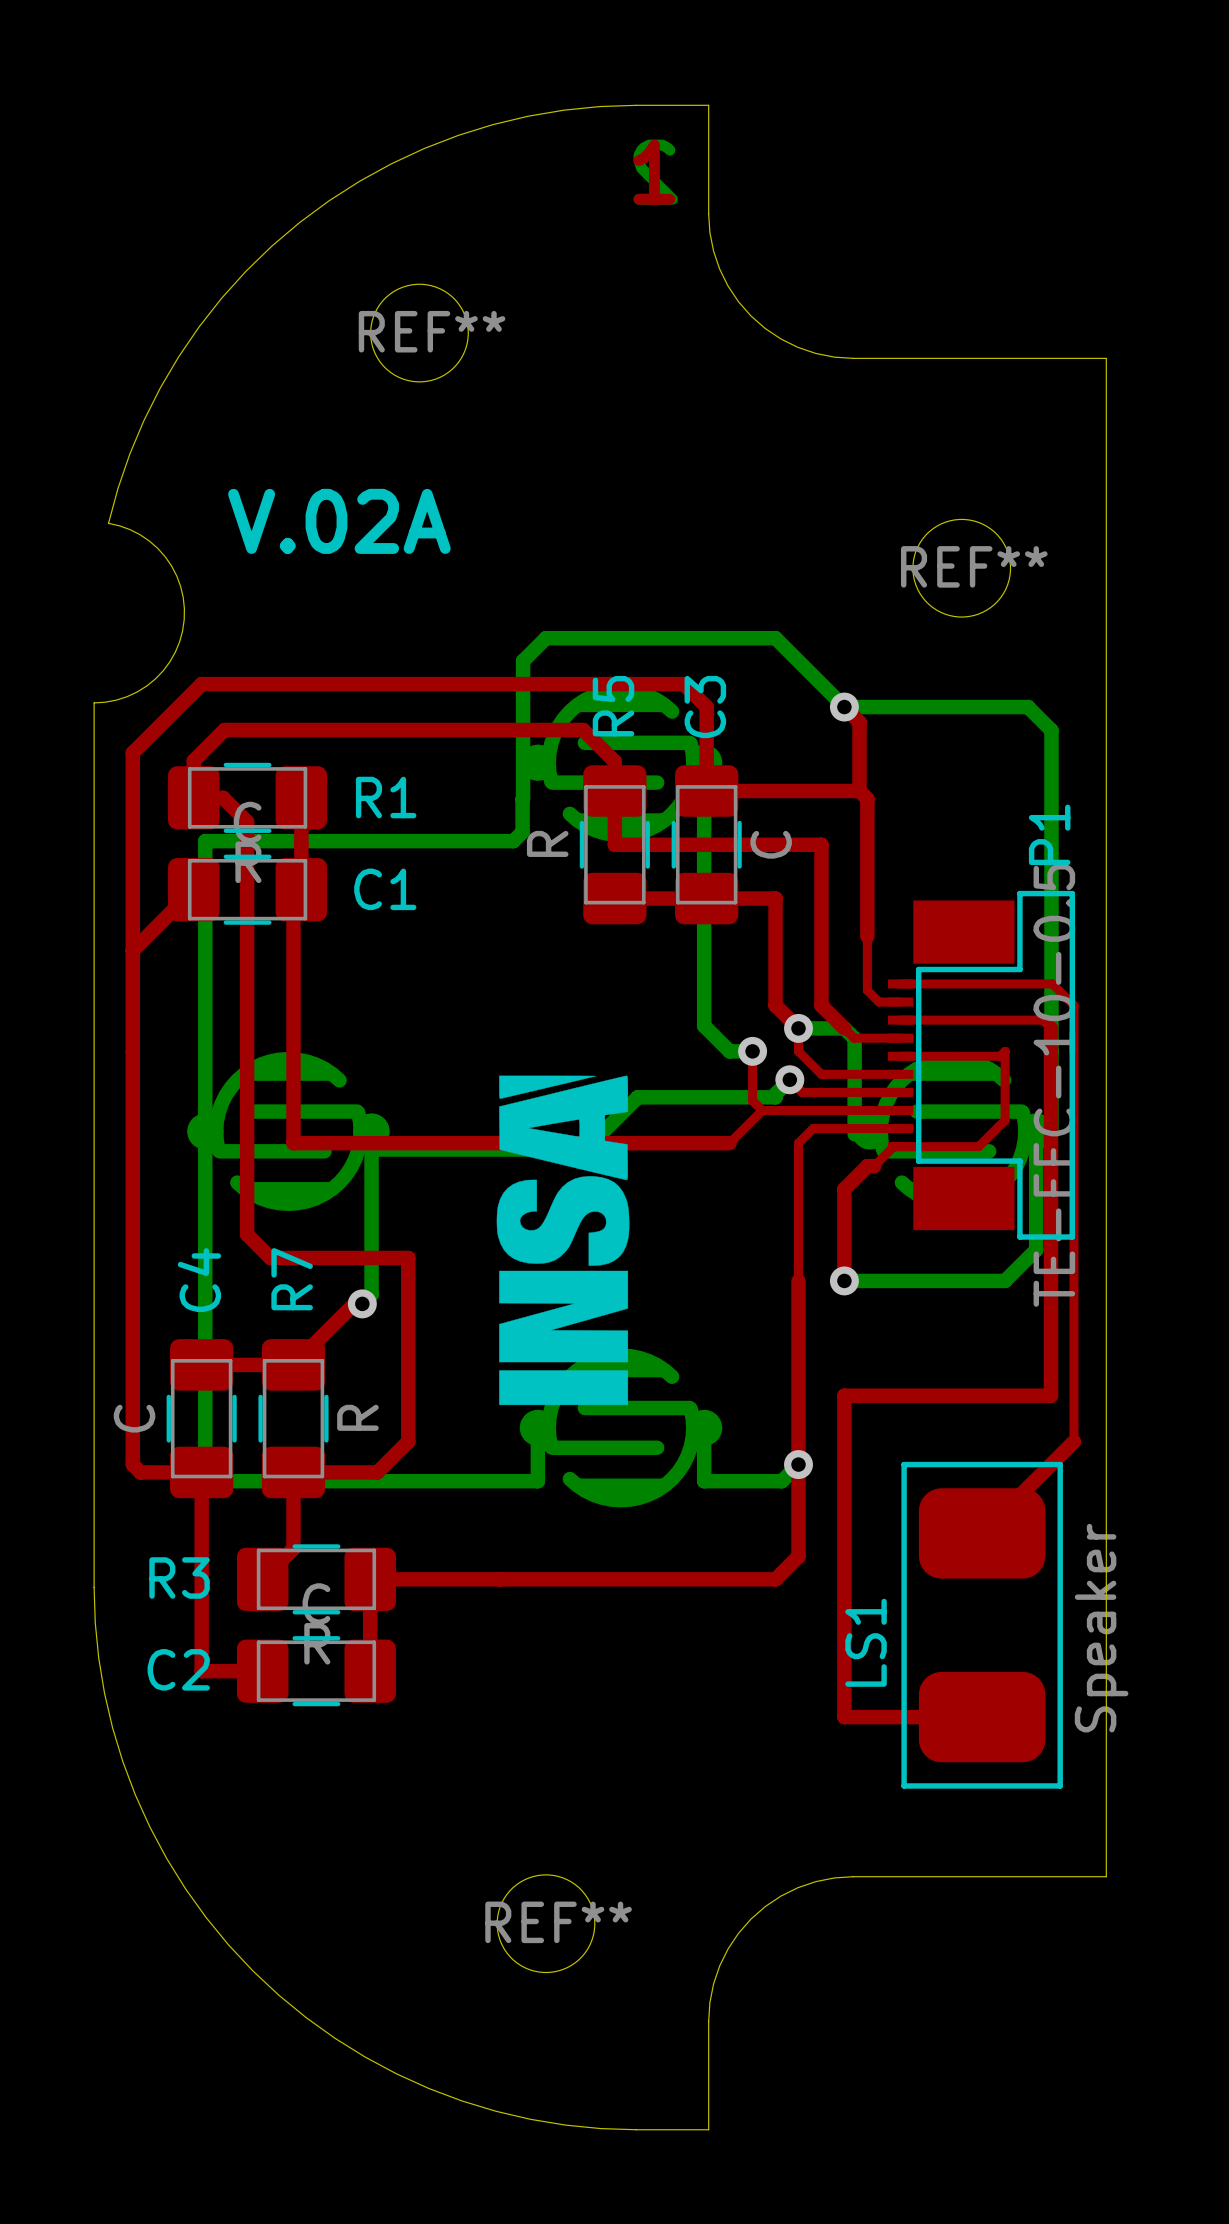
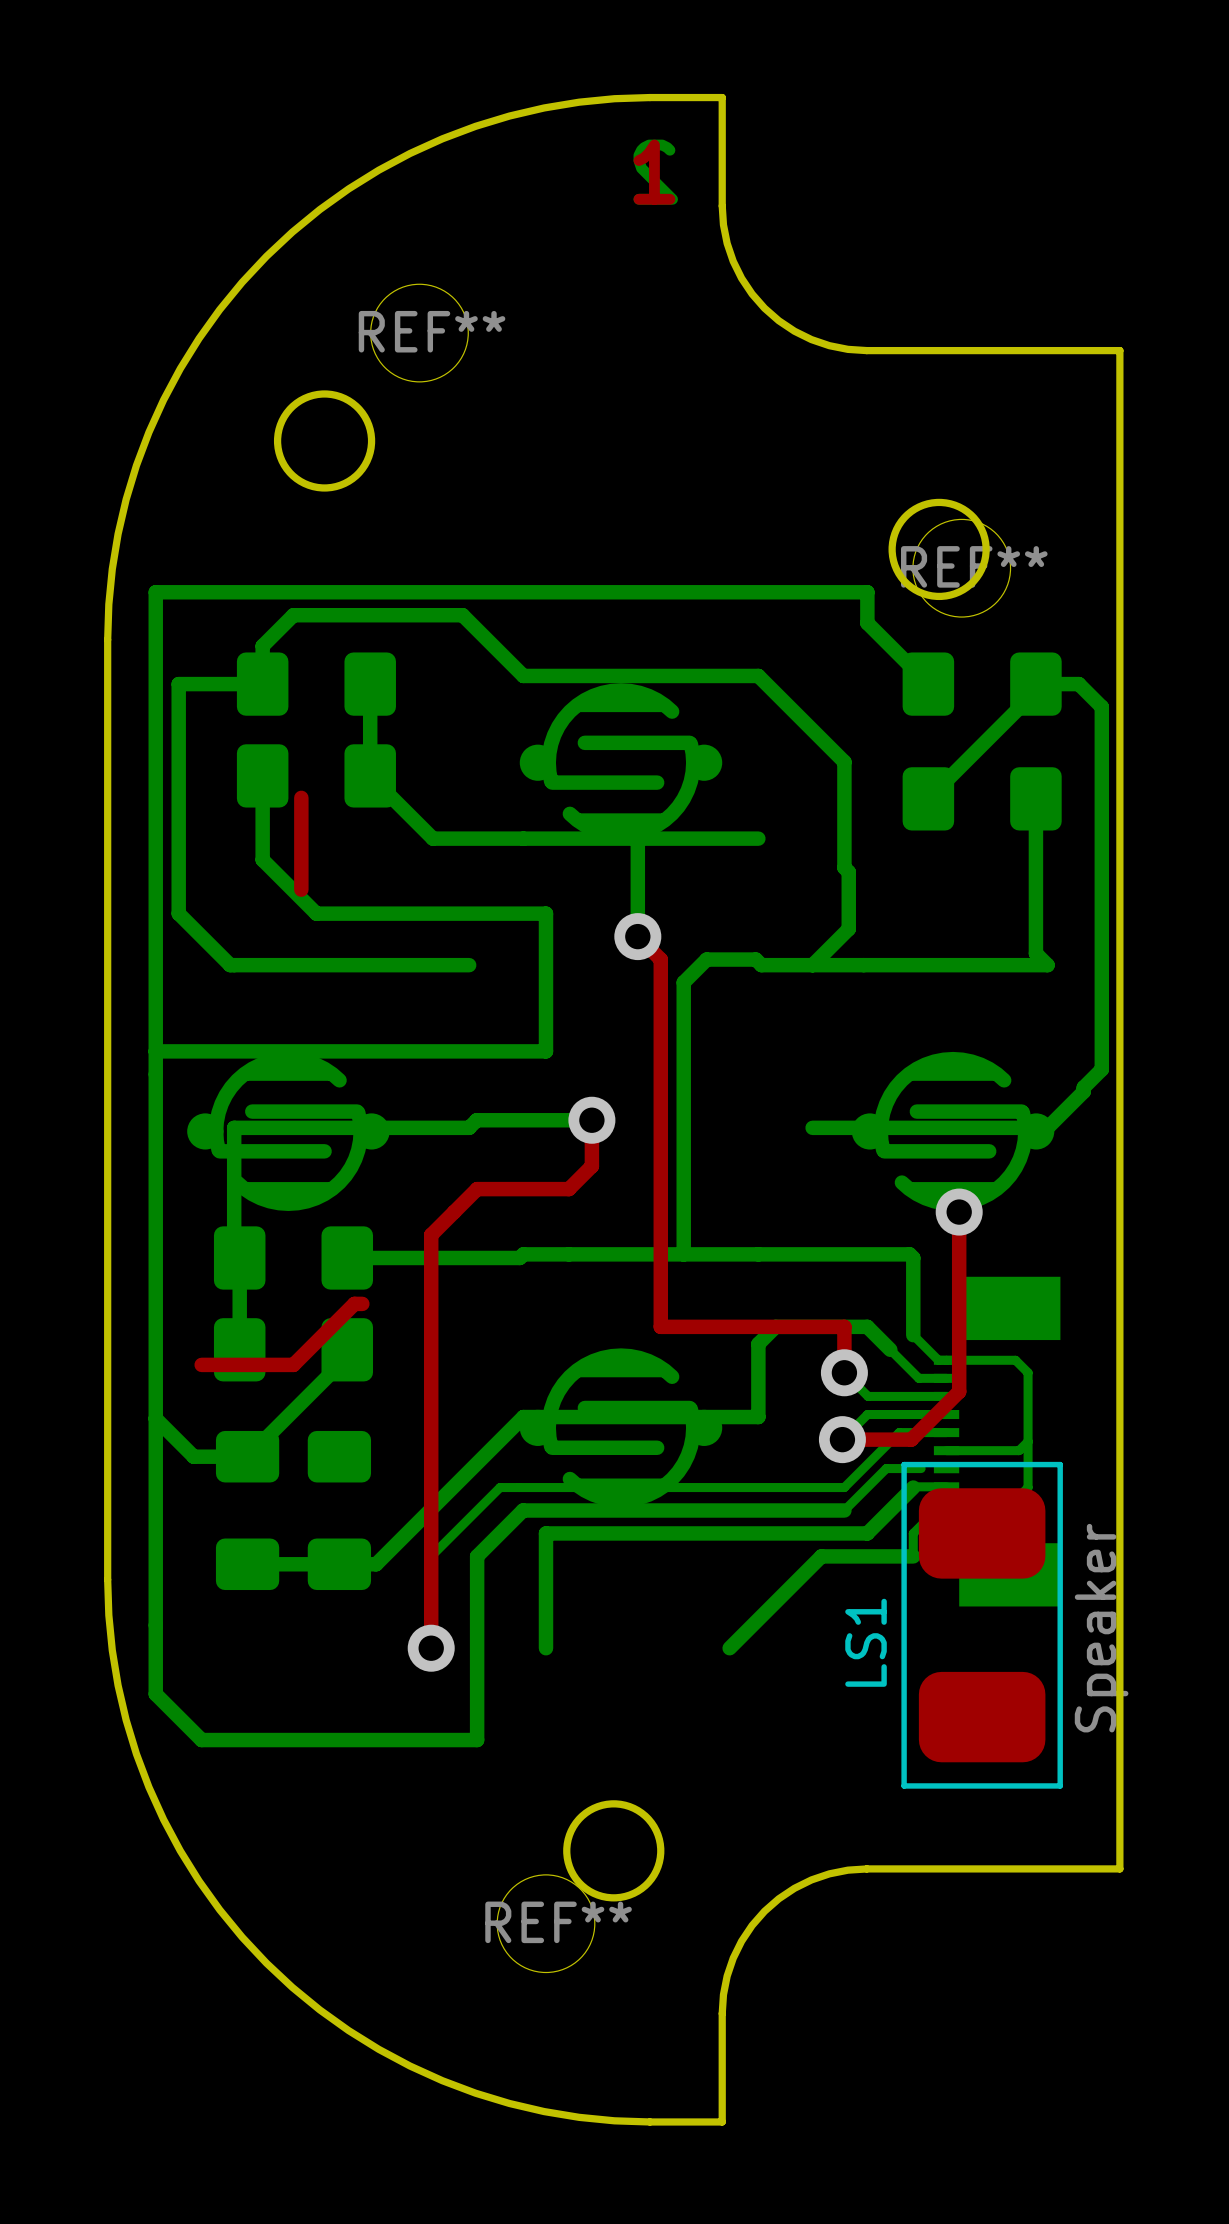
board edge: (636, 105) (708, 105) (708, 213) (713, 251) (728, 286) (738, 301) (765, 328) (780, 339) (815, 353) (853, 358) (1106, 358) (1106, 1876) (853, 1876) (815, 1881) (780, 1896) (765, 1906) (738, 1933) (728, 1949) (713, 1983) (708, 2021) (708, 2129) (636, 2129) (565, 2125) (530, 2119) (462, 2100) (396, 2073) (365, 2057) (335, 2038) (278, 1995) (252, 1970) (206, 1917) (185, 1888) (150, 1827) (122, 1761) (112, 1727) (104, 1693) (95, 1622) (94, 702) (127, 696) (155, 678) (175, 652) (184, 619) (180, 586) (165, 556) (140, 534) (108, 523) (129, 453) (143, 420) (178, 356) (221, 298) (272, 245) (328, 200) (391, 163) (458, 135) (528, 116) (563, 110) (636, 105) -> (649, 97) (614, 98) (544, 107) (475, 126) (410, 153) (348, 188) (292, 232) (266, 256) (219, 309) (199, 338) (163, 399) (136, 465) (118, 534) (108, 604) (107, 639) (108, 1615) (118, 1685) (126, 1720) (136, 1754) (163, 1819) (199, 1880) (219, 1909) (266, 1963) (292, 1987) (348, 2030) (378, 2049) (410, 2066) (475, 2093) (544, 2111) (579, 2117) (649, 2121) (722, 2121) (722, 2013) (727, 1976) (741, 1941) (752, 1925) (778, 1898) (794, 1888) (829, 1873) (866, 1868) (1119, 1868) (1119, 350) (866, 350) (829, 345) (794, 331) (778, 320) (752, 294) (741, 278) (727, 243) (722, 206) (722, 97) (649, 97)
round board edge: none -> [273, 390, 376, 492]
round board edge: none -> [888, 498, 990, 601]
text: V.02A (339, 521) -> none
bottom track: none -> (370, 684) (370, 775) (432, 838) (758, 838)
bottom track: none -> (928, 684) (867, 623) (867, 592) (155, 592) (155, 1694) (201, 1740) (477, 1740) (477, 1556) (523, 1510) (844, 1510) (886, 1468) (921, 1468)
part: none -> (982, 684)
top track: (844, 707) (859, 722) (859, 791) -> none
via: (844, 707) -> none
bottom track: (704, 762) (704, 1025) (729, 1051) (752, 1051) -> none
bottom track: none -> (262, 775) (262, 859) (316, 913) (545, 913) (545, 1051) (155, 1051)
top track: (859, 791) (706, 791) (706, 707) (683, 684) (201, 684) (132, 752) (132, 1464) (140, 1472) (201, 1472) (201, 1671) (262, 1671) -> none
top track: (859, 791) (867, 798) (867, 990) (878, 1002) (900, 1002) -> none
R1 side: top (247, 797) -> bottom (316, 775)
bottom track: (523, 798) (523, 661) (545, 638) (775, 638) (844, 707) (1028, 707) (1051, 730) (1051, 1134) -> none
bottom track: none -> (928, 798) (1035, 691) (1035, 684) (1078, 684) (1101, 707) (1101, 1069) (1083, 1087) (1083, 1091) (1047, 1127) (812, 1127)
part: none -> (982, 798)
bottom track: none -> (1035, 798) (1035, 953) (1047, 965) (761, 965) (755, 959) (706, 959) (683, 982) (683, 1254)
bottom track: (522, 799) (522, 832) (513, 841) (205, 841) (205, 1468) (218, 1481) (537, 1481) (537, 1427) -> none
bottom track: none -> (637, 838) (637, 936)
R5 side: top (614, 844) -> bottom (293, 1349)
C3 side: top (706, 844) -> bottom (293, 1257)
top track: (193, 889) (132, 950) -> none
C1 side: top (247, 889) -> bottom (316, 684)
top track: (614, 898) (775, 898) (775, 1005) (798, 1028) (798, 1051) (821, 1074) (900, 1074) -> none
top track: (293, 913) (293, 1143) (729, 1143) (762, 1110) -> none
top track: none -> (637, 936) (660, 959) (660, 1326) (844, 1326) (844, 1372)
via: none -> (637, 936)
bottom track: none -> (469, 965) (230, 965) (178, 913) (178, 684) (262, 684) (262, 646) (293, 615) (462, 615) (523, 675) (758, 675) (844, 761) (844, 867) (848, 872) (848, 929) (812, 965)
top track: (900, 983) (1052, 983) (1073, 1005) (1073, 1441) (982, 1533) -> none
top track: (900, 1020) (1042, 1020) (1051, 1028) (1051, 1395) (844, 1395) (844, 1717) (982, 1717) -> none
bottom track: (798, 1028) (844, 1028) (854, 1038) (854, 1134) -> none
via: (798, 1028) -> none
top track: (900, 1038) (854, 1038) (821, 1005) (821, 844) (614, 844) (614, 761) (583, 730) (224, 730) (193, 760) (193, 797) (223, 797) (247, 821) (247, 1234) (270, 1257) (408, 1257) (408, 1441) (377, 1472) (293, 1472) (293, 1548) (262, 1579) -> none
top track: (752, 1051) (752, 1100) (762, 1110) -> none
via: (752, 1051) -> none
top track: (900, 1056) (1000, 1056) (1005, 1051) (1005, 1120) (978, 1146) (893, 1146) (874, 1166) (867, 1166) (844, 1189) (844, 1280) -> none
P1 side: top (981, 1065) -> bottom (997, 1441)
drawing: [496, 1075, 630, 1406] -> none
top track: (789, 1079) (802, 1092) (900, 1092) -> none
bottom track: (789, 1079) (775, 1094) (775, 1097) (637, 1097) (585, 1149) (371, 1149) -> none
via: (789, 1079) -> none
top track: (762, 1110) (900, 1110) -> none
top track: none -> (591, 1120) (591, 1166) (568, 1189) (477, 1189) (431, 1235) (431, 1648)
bottom track: none -> (591, 1120) (476, 1120) (469, 1127) (234, 1127) (234, 1252) (239, 1257) (239, 1349)
via: none -> (591, 1120)
top track: (900, 1128) (813, 1128) (798, 1143) (798, 1556) (775, 1579) (370, 1579) (370, 1671) -> none
bottom track: (371, 1131) (371, 1294) (362, 1303) -> none
bottom track: (1036, 1131) (1036, 1249) (1005, 1280) (844, 1280) -> none
top track: none -> (959, 1212) (959, 1391) (911, 1439) (842, 1439)
via: none -> (959, 1212)
bottom track: none -> (347, 1257) (519, 1257) (523, 1254) (909, 1254) (913, 1257) (913, 1335) (938, 1360) (1015, 1360) (1028, 1372) (1028, 1487) (1010, 1504) (946, 1504)
via: (844, 1280) -> none
via: (362, 1303) -> none
bottom track: none -> (347, 1349) (347, 1357) (247, 1456) (193, 1456) (155, 1418)
bottom track: none -> (844, 1372) (868, 1396) (946, 1396)
via: none -> (844, 1372)
bottom track: none -> (946, 1378) (918, 1378) (867, 1326) (775, 1326) (758, 1344) (758, 1417) (523, 1417) (376, 1564) (247, 1564)
bottom track: none -> (946, 1414) (867, 1414) (842, 1439)
C4: C (201, 1418) -> none
R7: R (293, 1418) -> none
bottom track: (704, 1427) (704, 1481) (781, 1481) (798, 1464) -> none
bottom track: none -> (946, 1432) (899, 1432) (844, 1487) (500, 1487) (431, 1556) (431, 1648)
via: none -> (842, 1439)
bottom track: none -> (1028, 1441) (1019, 1450) (946, 1450)
via: (798, 1464) -> none
bottom track: none -> (946, 1486) (914, 1486) (867, 1533) (545, 1533) (545, 1648)
bottom track: none -> (946, 1522) (923, 1522) (913, 1533) (913, 1556) (821, 1556) (729, 1648)
R3 side: top (316, 1579) -> bottom (247, 1510)
via: none -> (431, 1648)
C2 side: top (316, 1671) -> bottom (339, 1510)
round board edge: none -> [563, 1800, 665, 1902]

